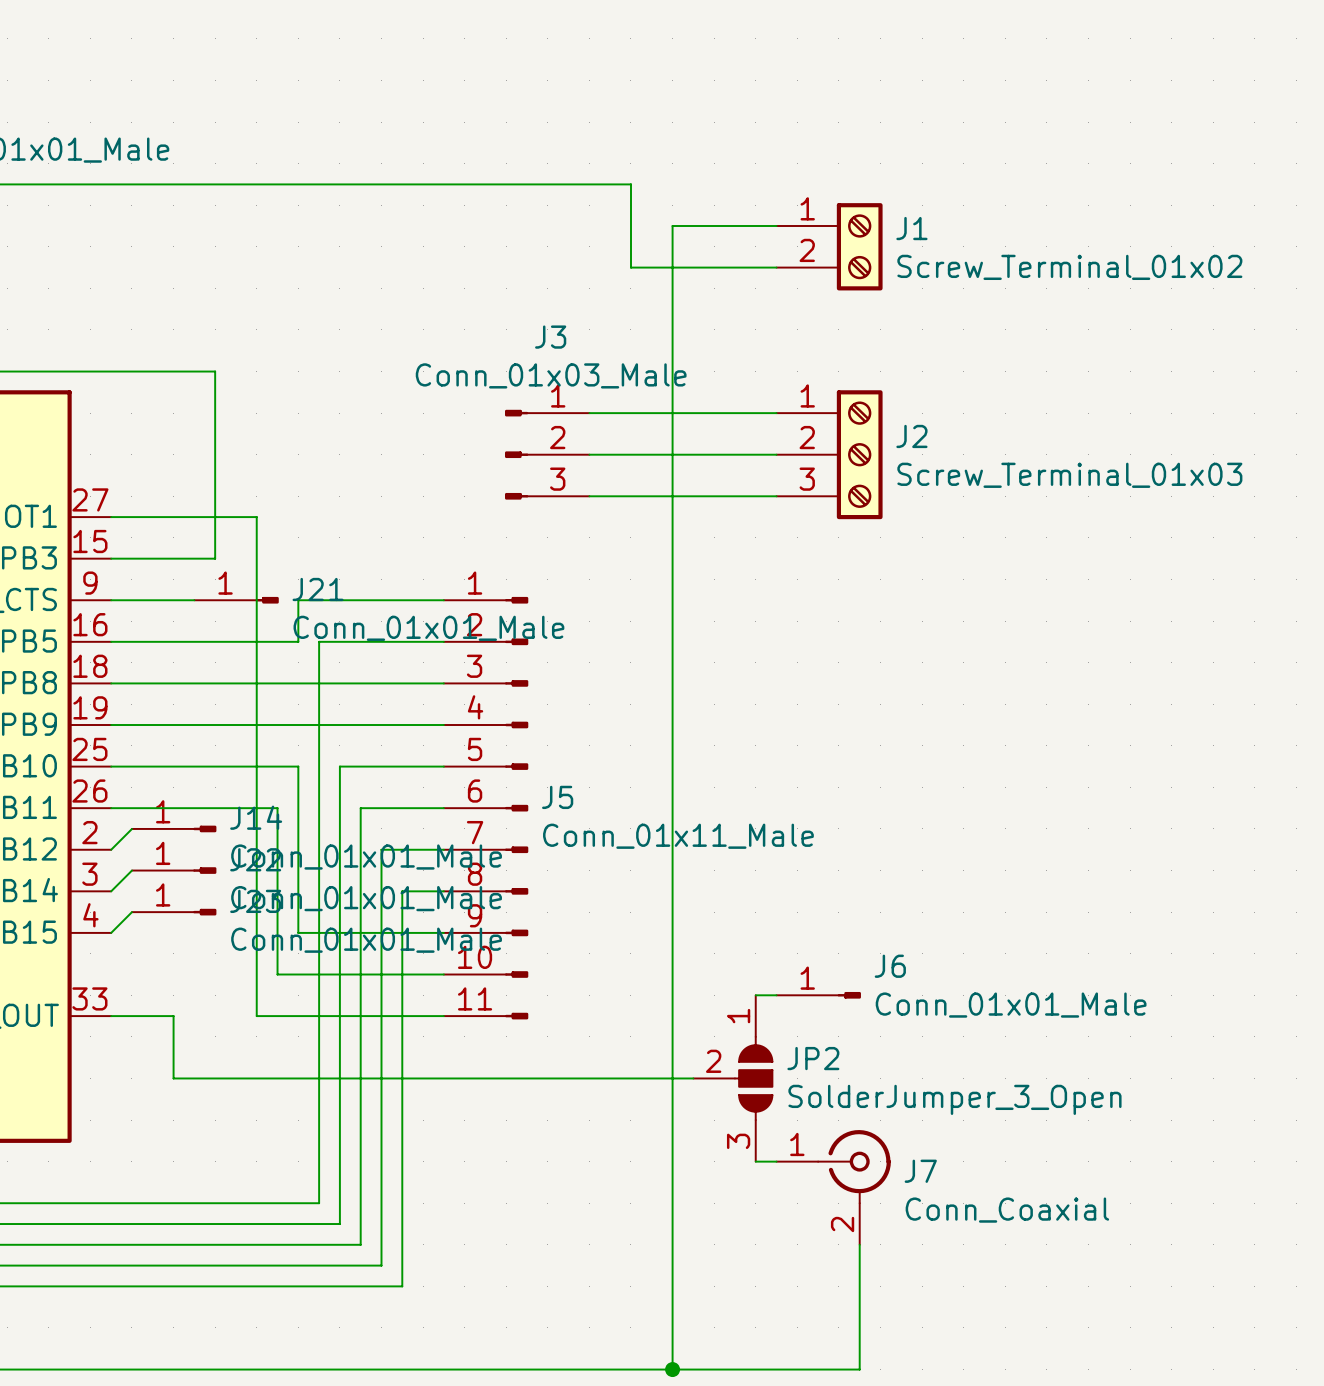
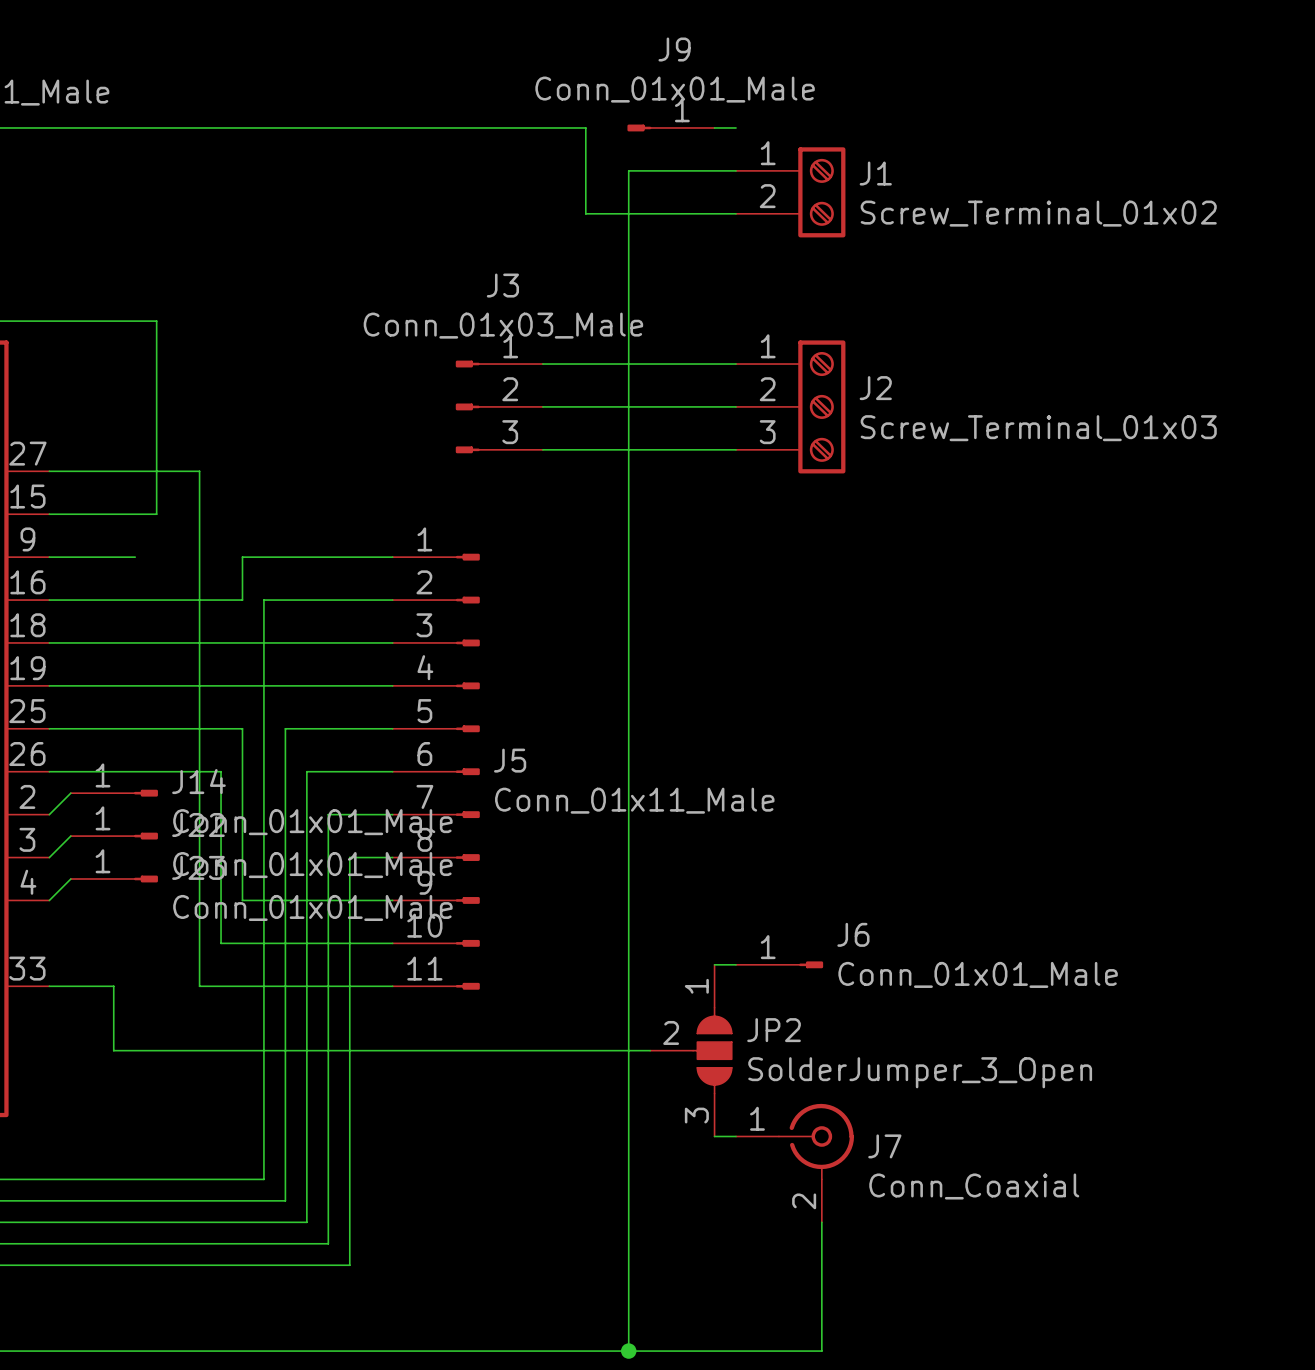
J9: none -> Conn_01x01_Male (671, 127)
wire: none -> (714, 127) (736, 127)
J21: Conn_01x01_Male (236, 600) -> none

